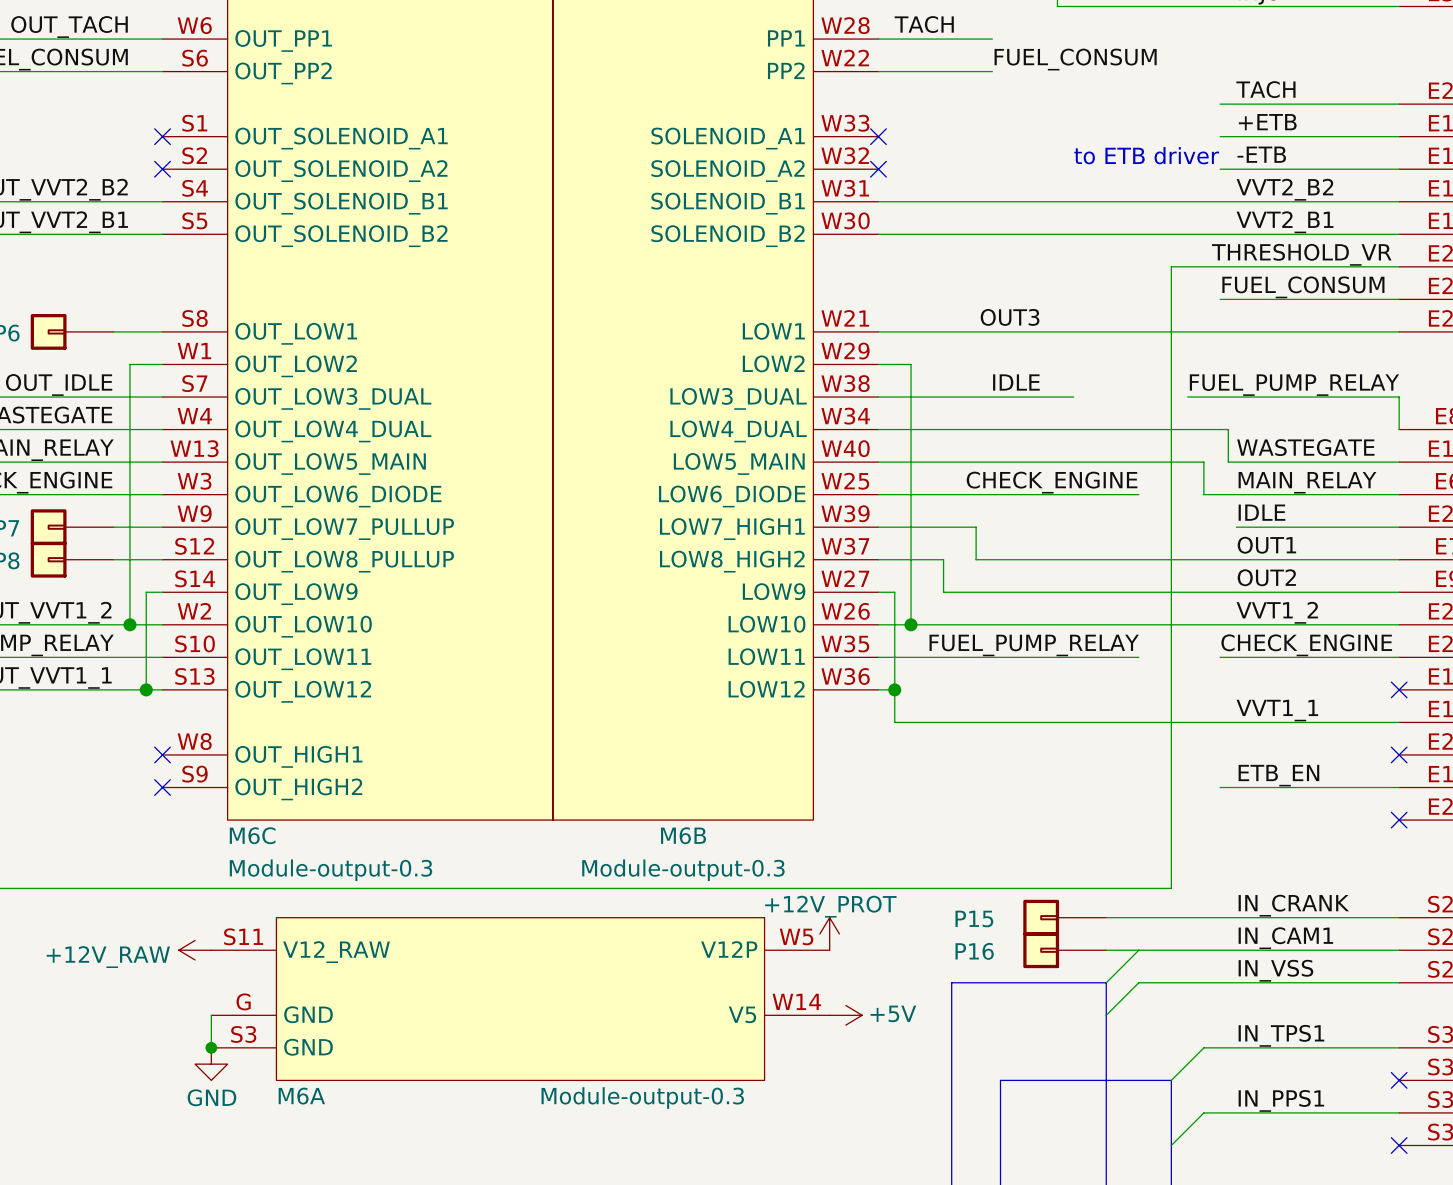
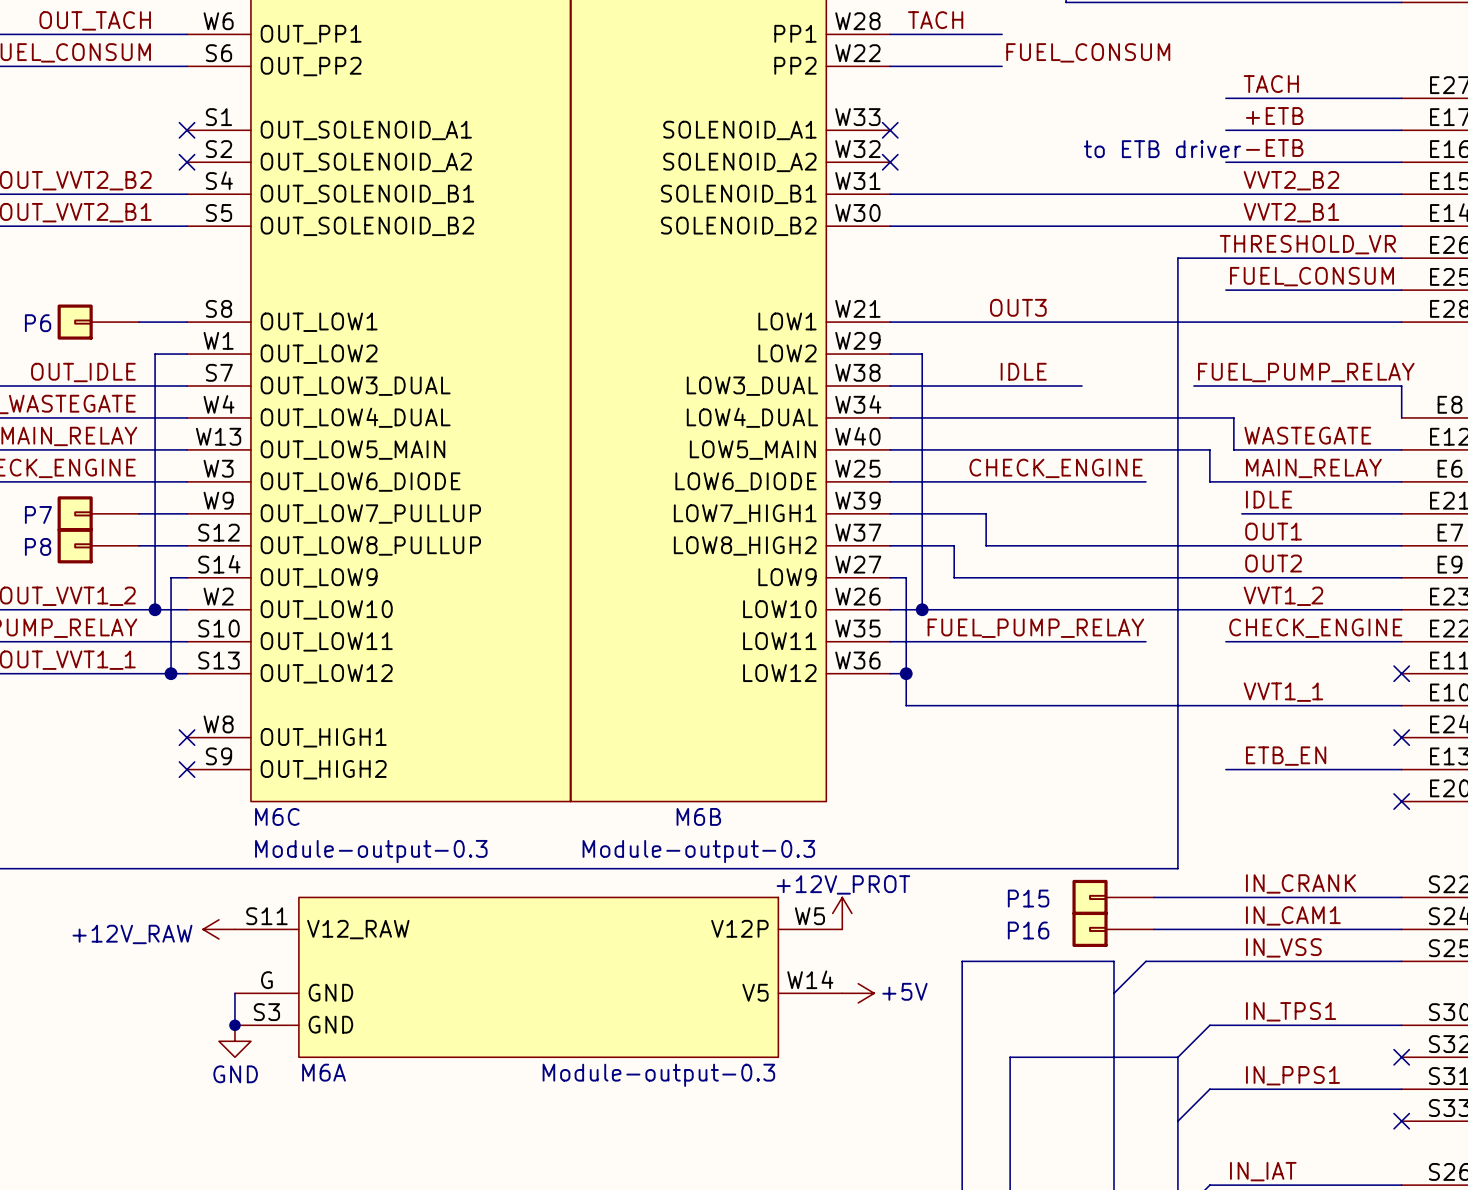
P15 position: (1064, 917) -> (1113, 897)
P16 position: (1064, 950) -> (1113, 929)
wire: (1138, 950) (1106, 982) -> none

